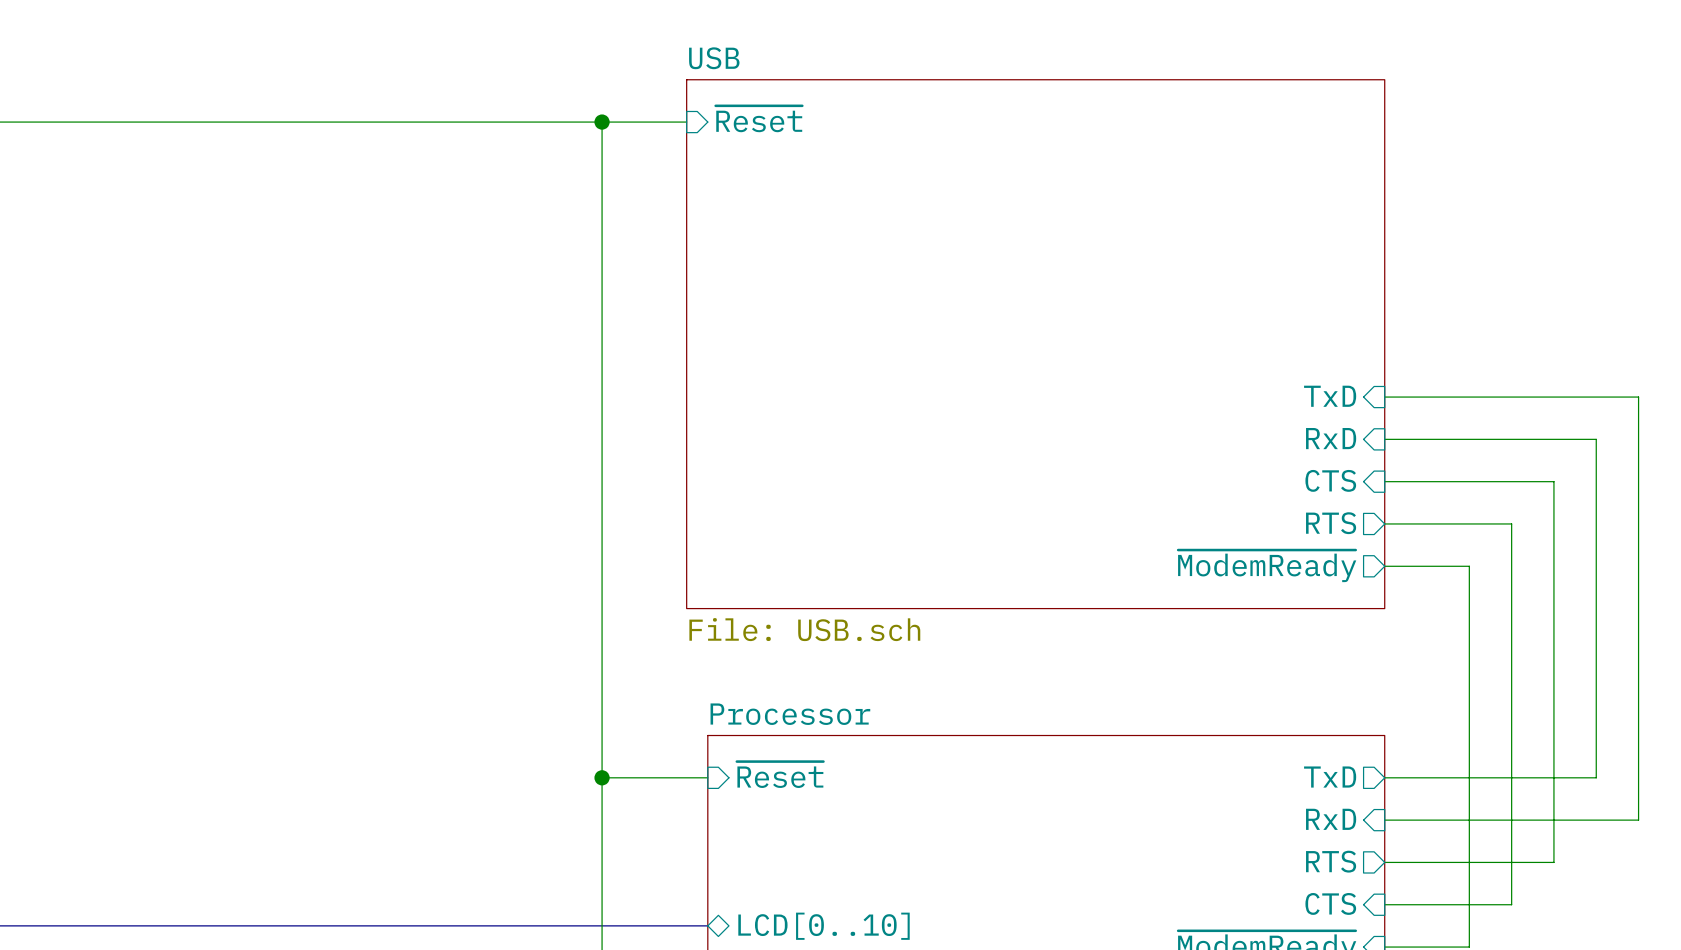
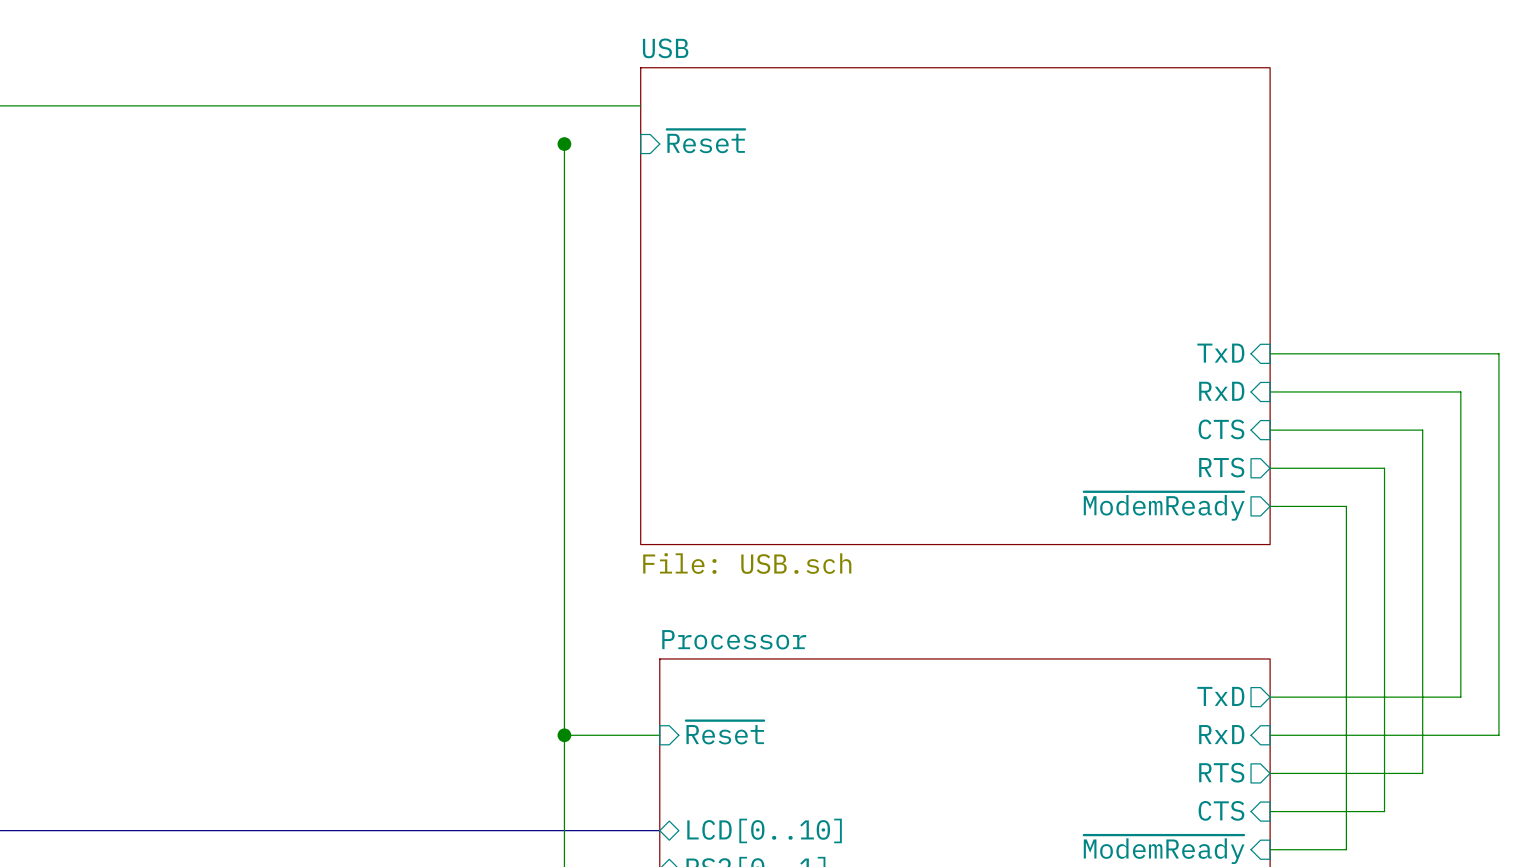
sheet pin position: ~{Reset} (758, 119) -> ~{Reset} (705, 141)
wire: (602, 122) (602, 164) -> none
junction position: (602, 122) -> (564, 144)
sheet pin position: ~{Reset} (780, 774) -> ~{Reset} (724, 732)
wire: (602, 777) (707, 777) -> (564, 735) (659, 735)
junction position: (602, 777) -> (564, 735)

